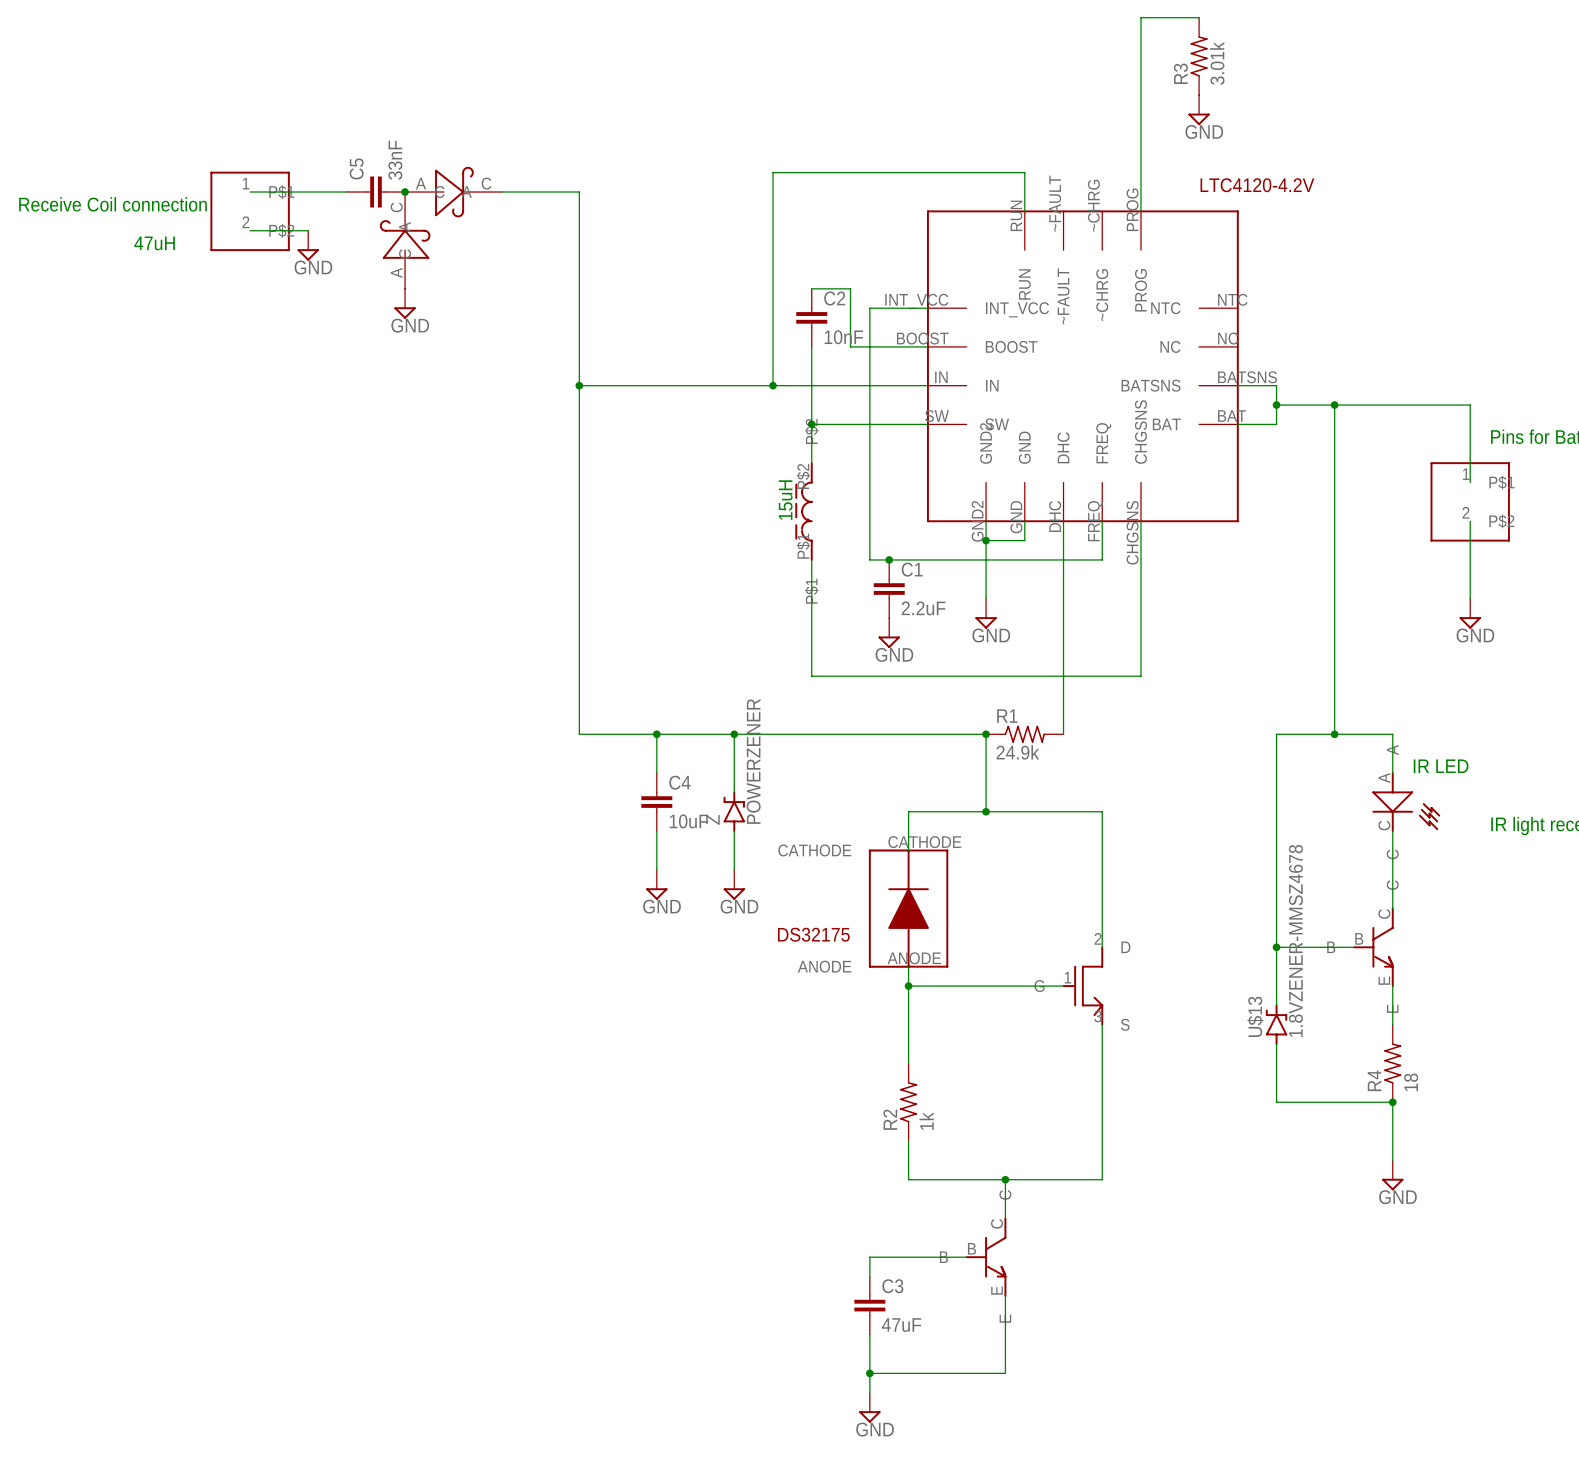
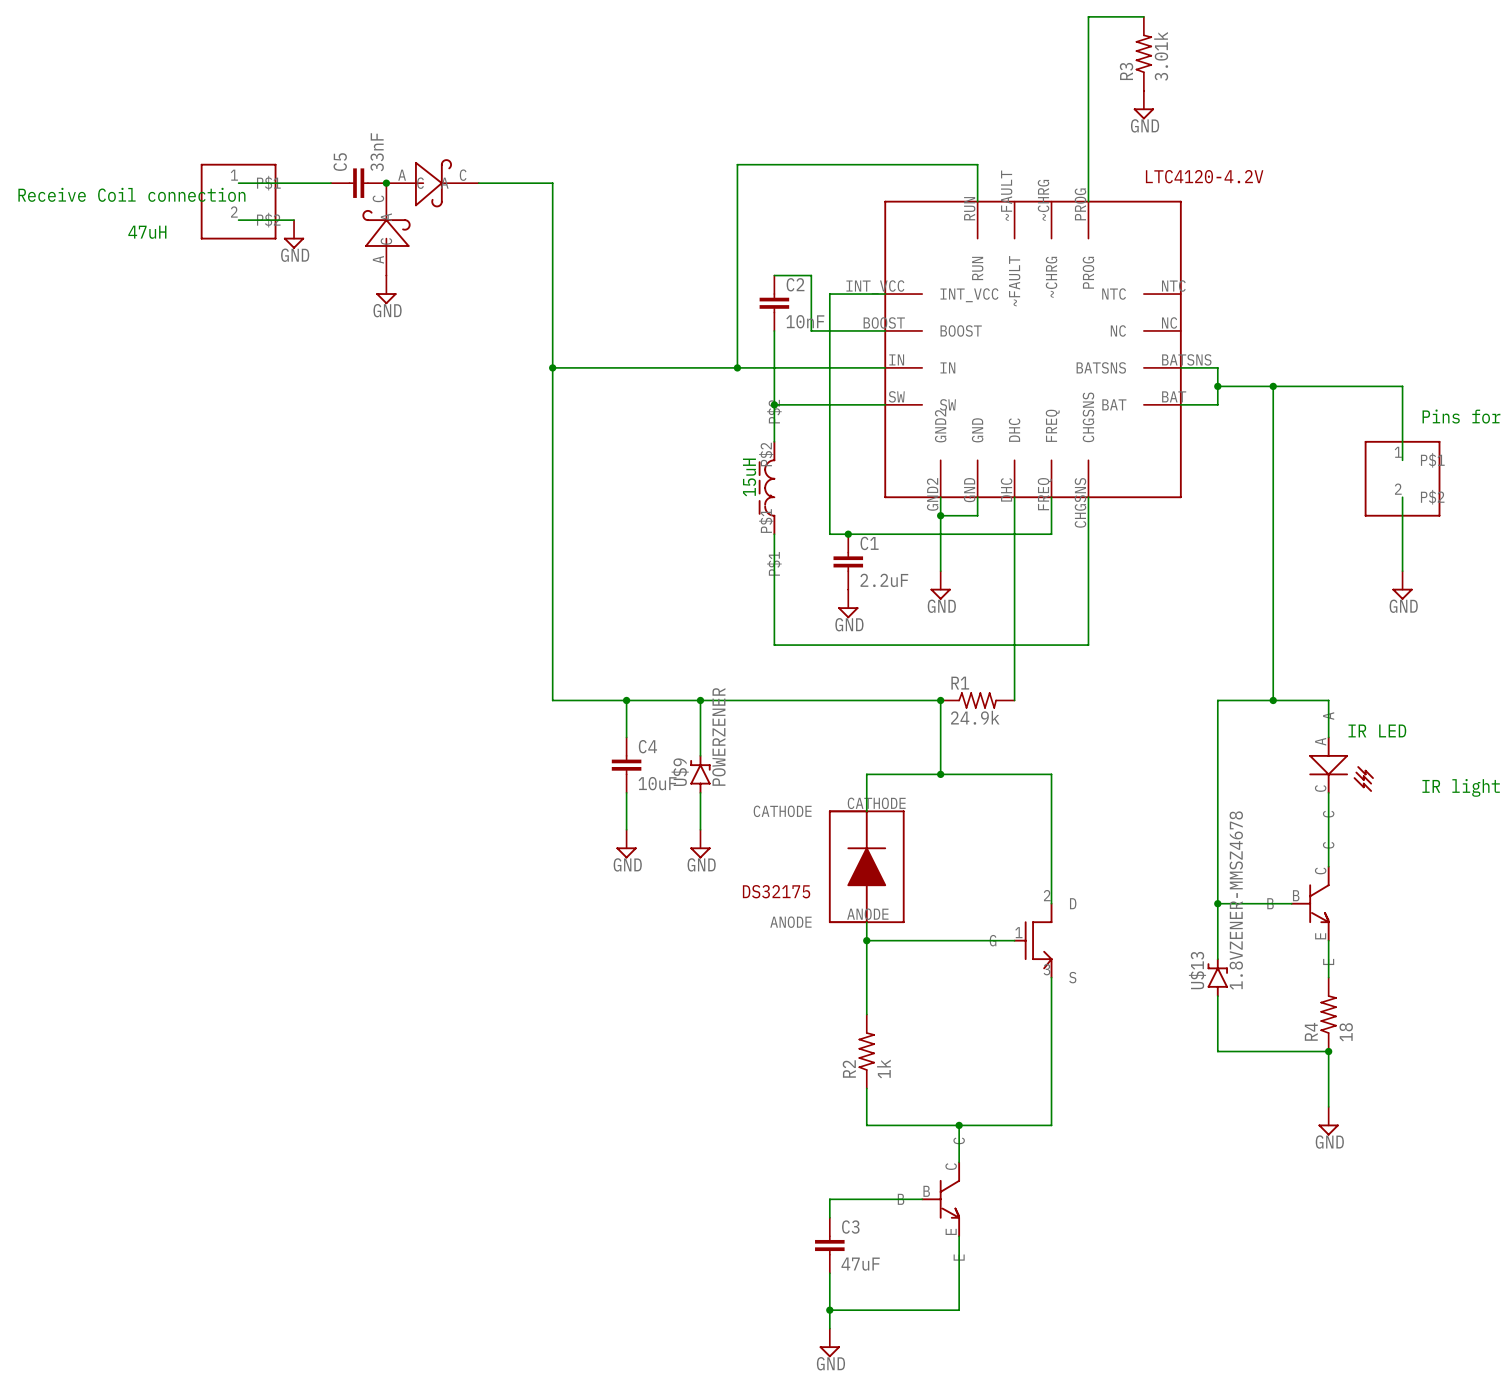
Z name: Z (712, 819) -> U$9 (680, 772)

